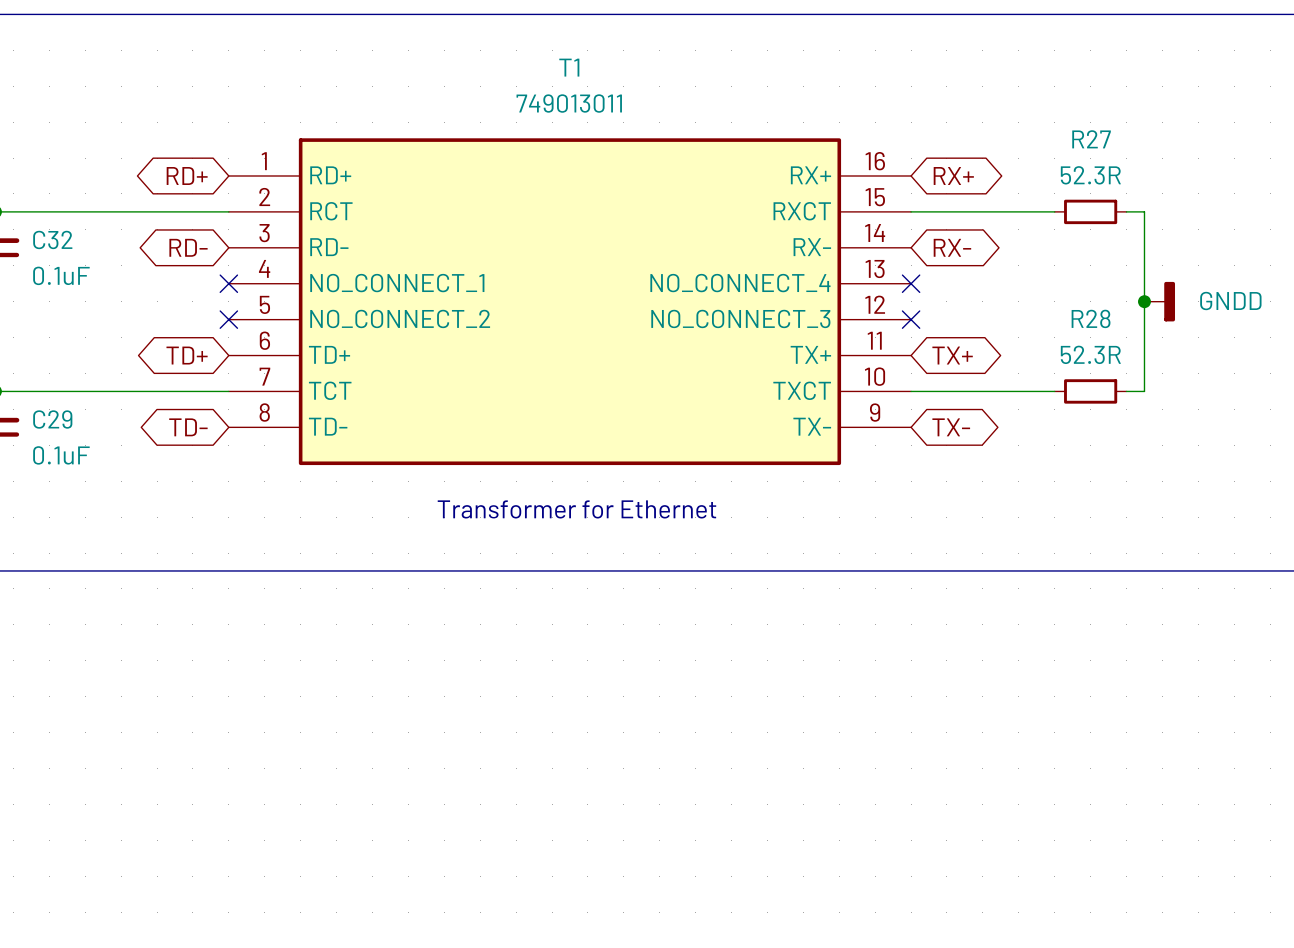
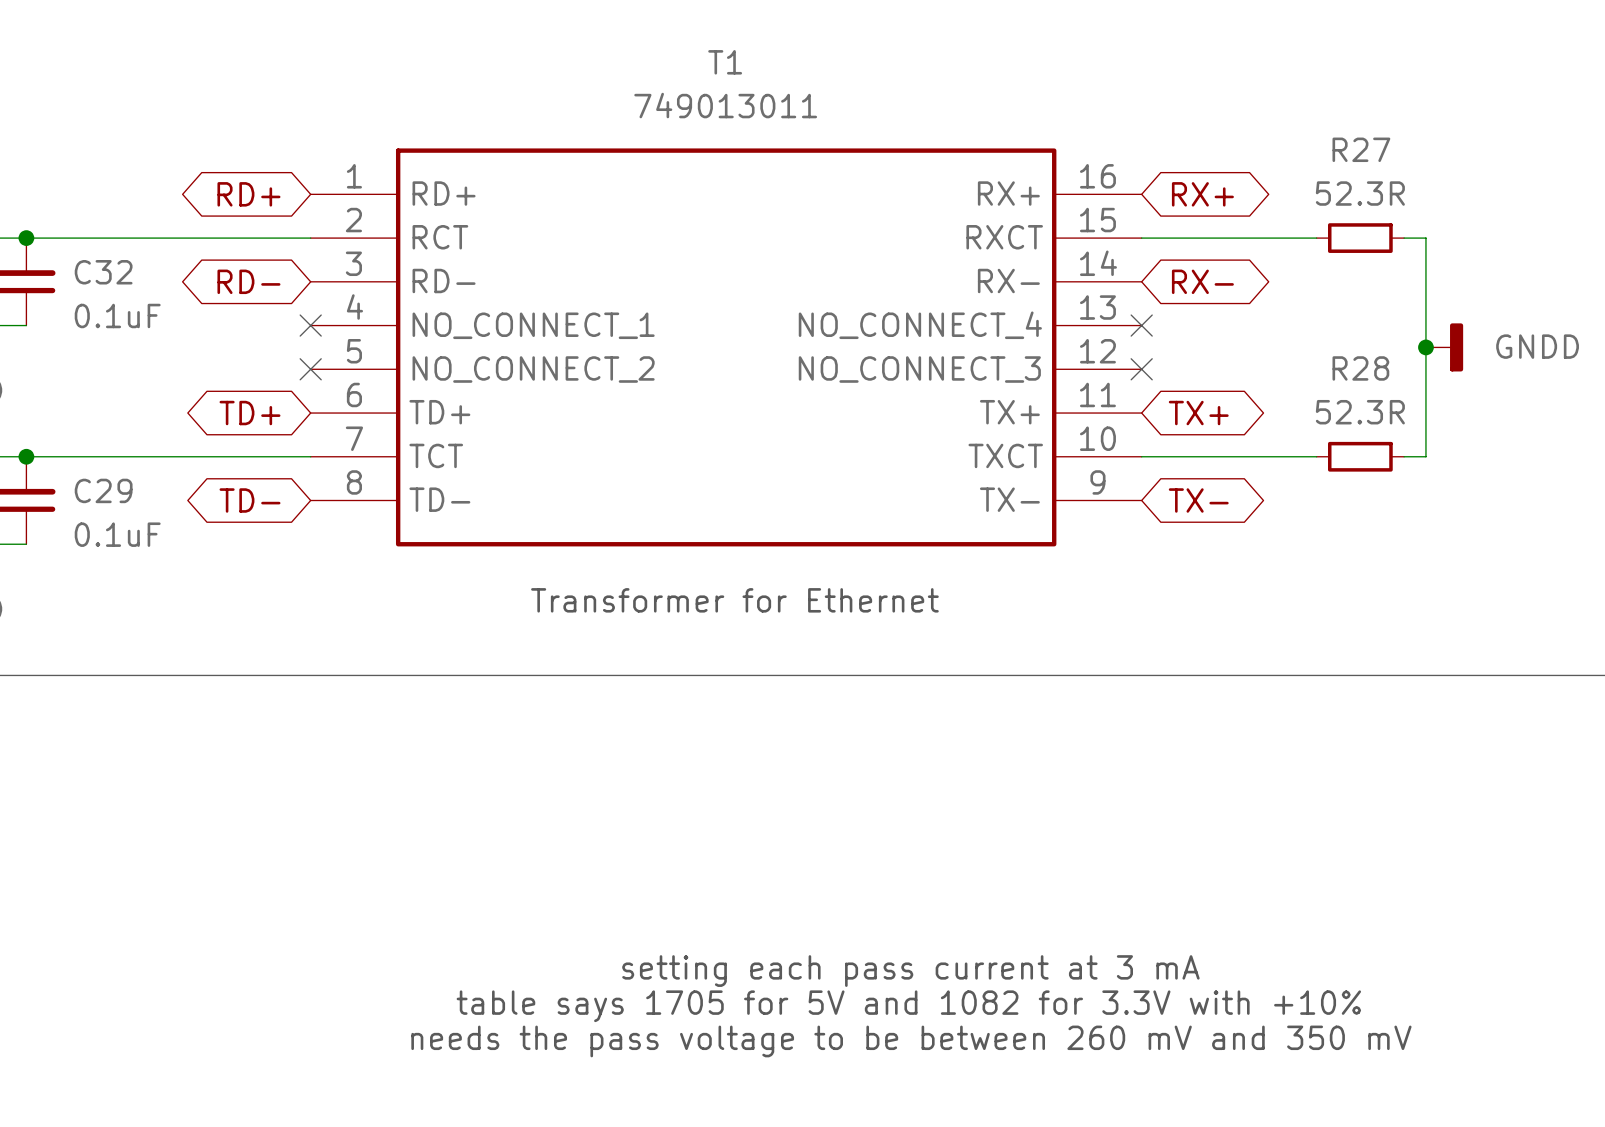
text: none -> setting each pass current at 3 mA (910, 971)
text: none -> table says 1705 for 5V and 1082 for 3.3V with +10% (908, 1006)
text: none -> needs the pass voltage to be between 260 mV and 350 mV (911, 1041)

